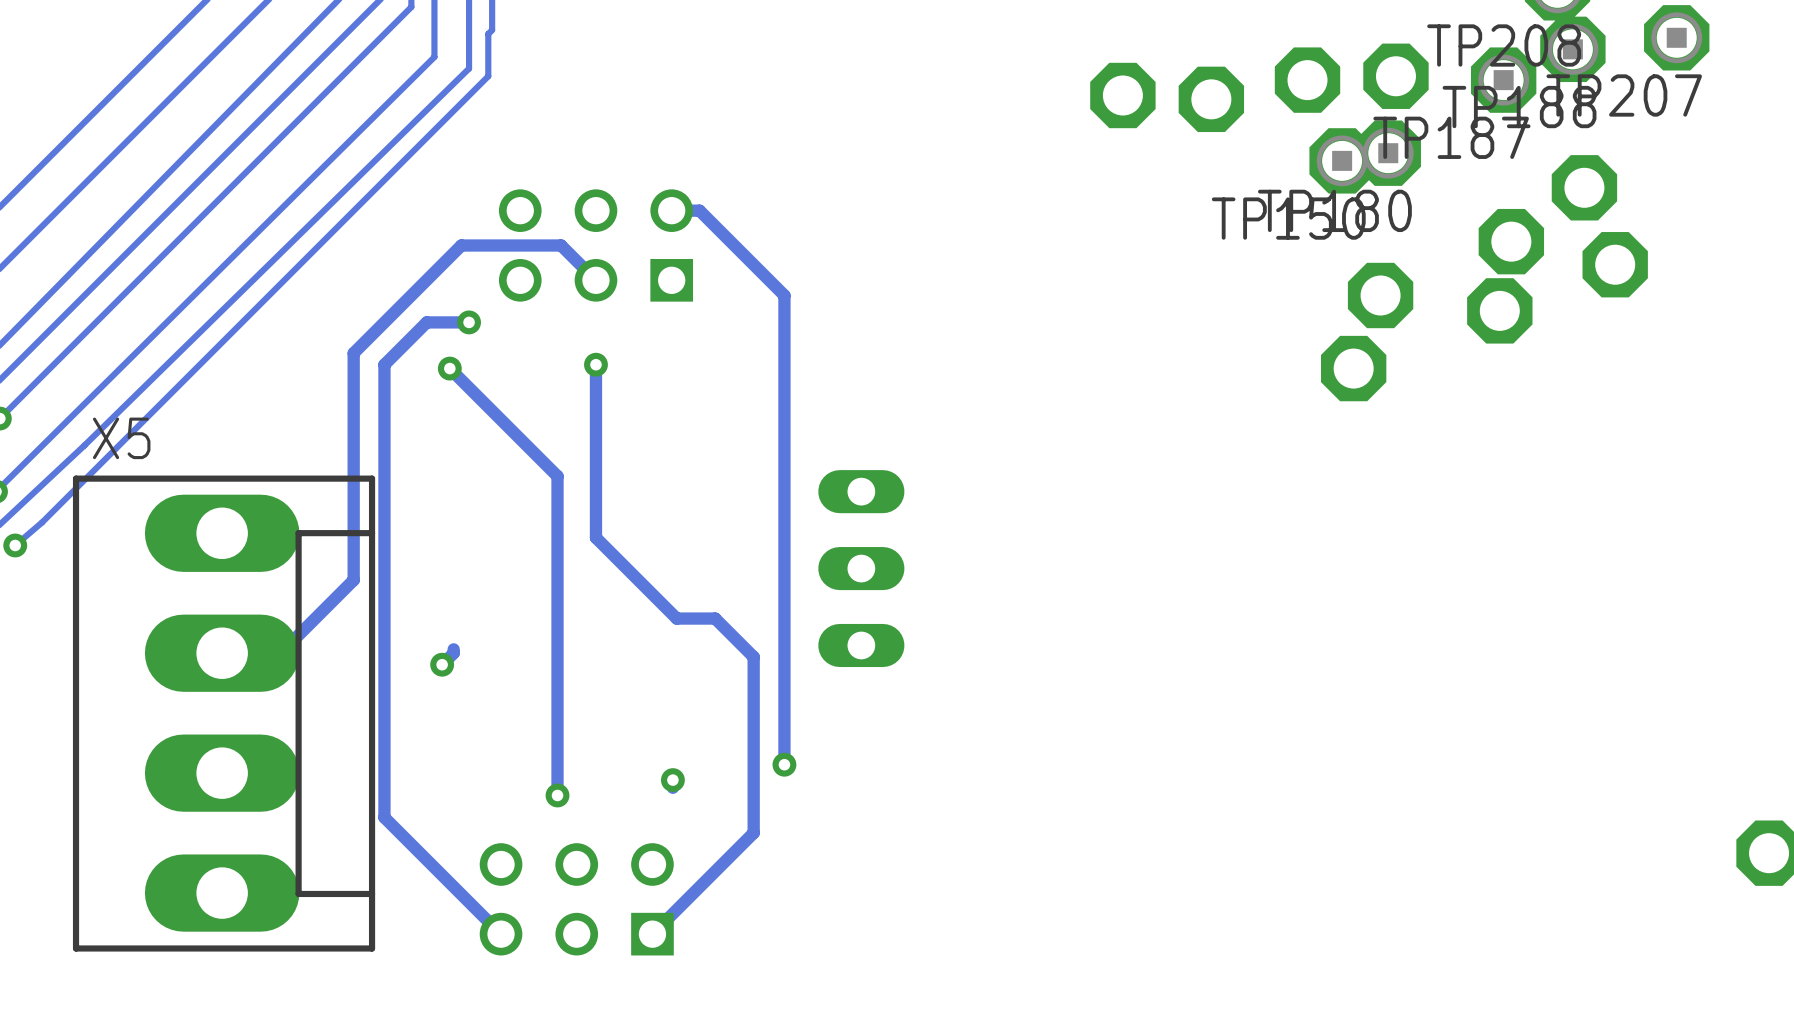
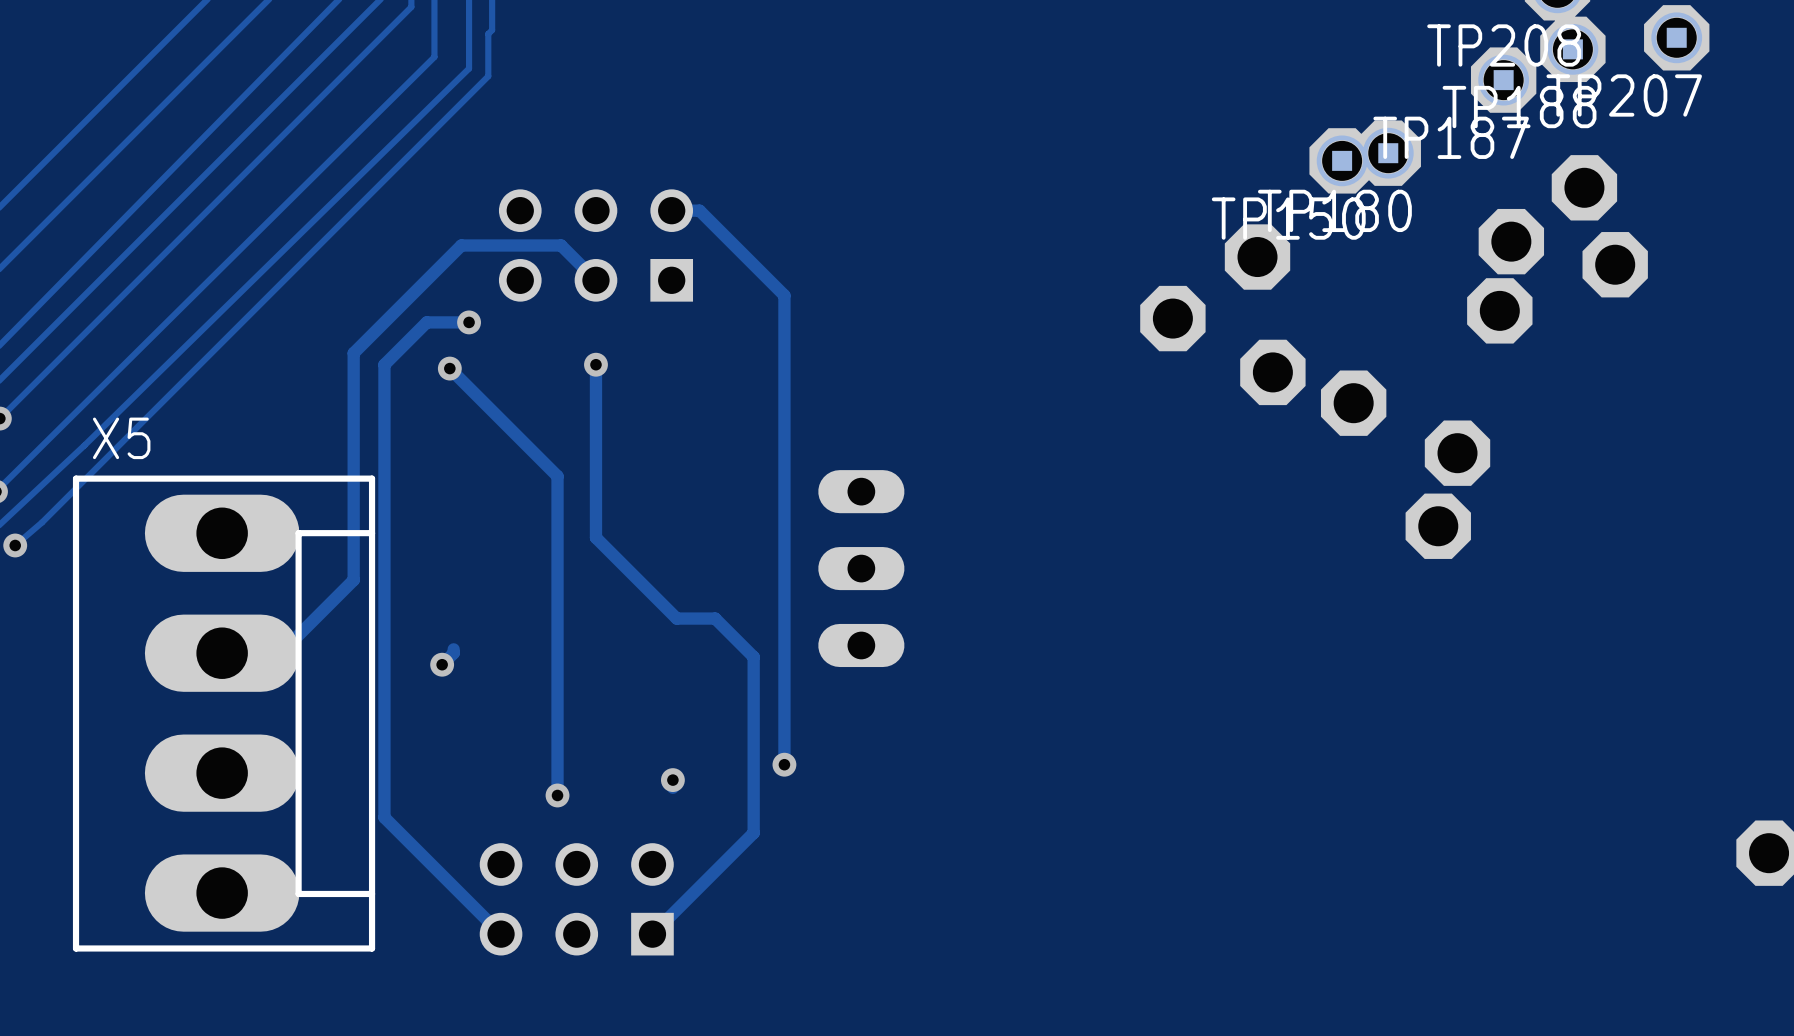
part: (1395, 76) -> none
part: (1307, 80) -> none
part: (1122, 95) -> none
part: (1211, 99) -> none
part: none -> (1257, 257)
part: (1380, 295) -> none
part: none -> (1172, 318)
part position: (1353, 368) -> (1353, 403)
part: none -> (1272, 372)
part: none -> (1457, 453)
part: none -> (1438, 526)

